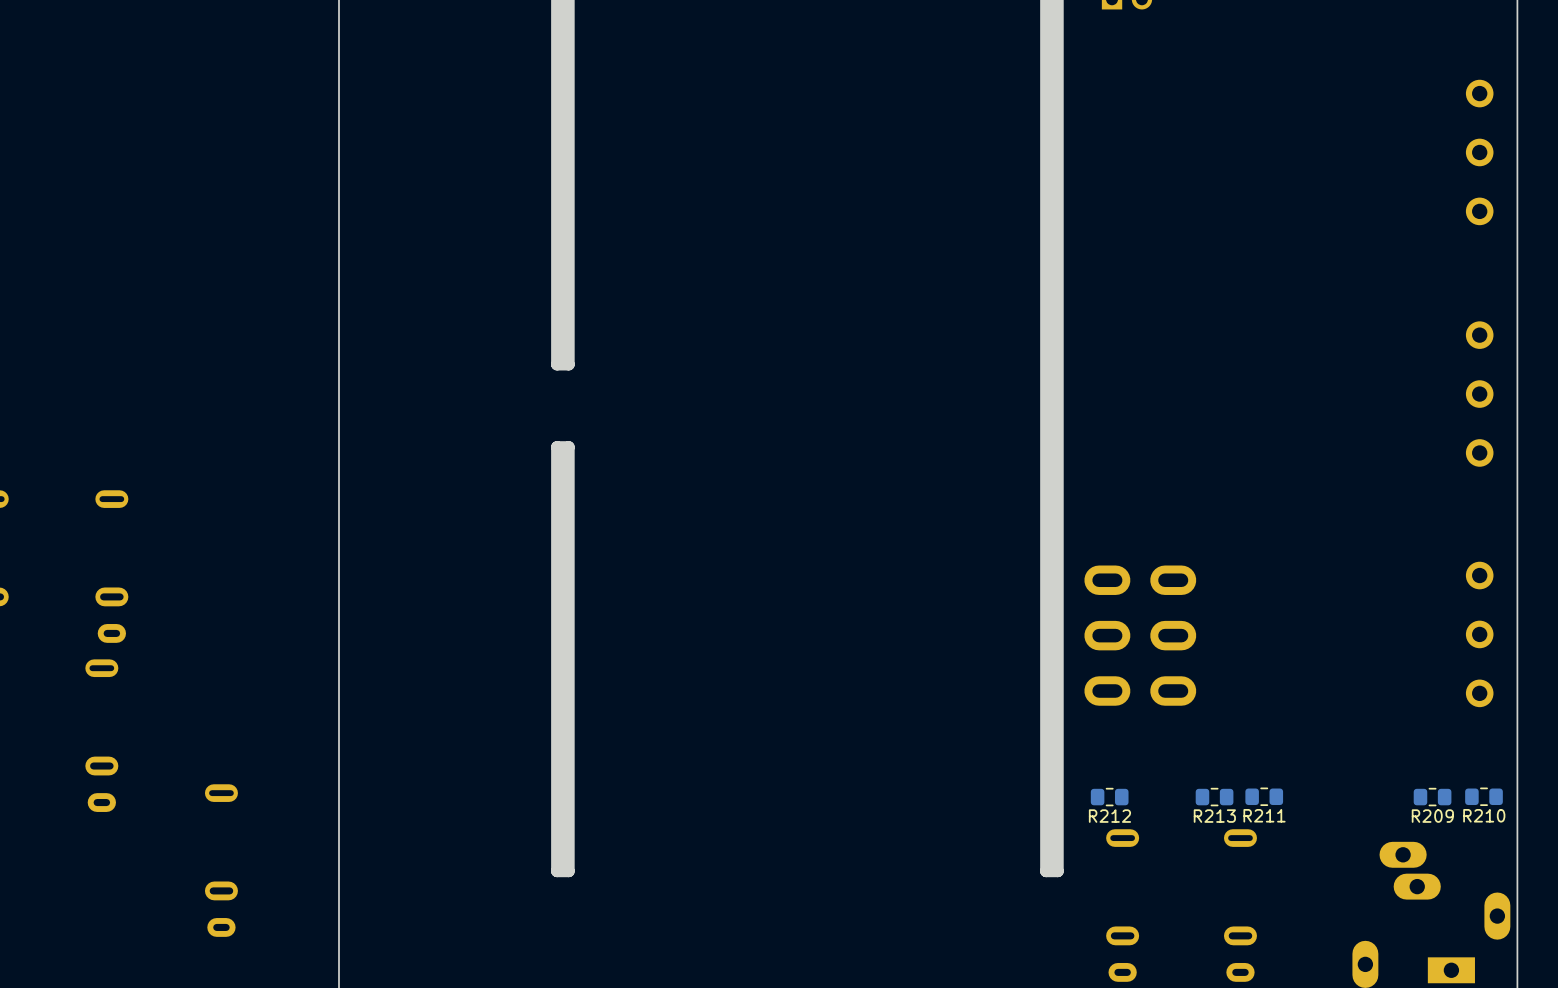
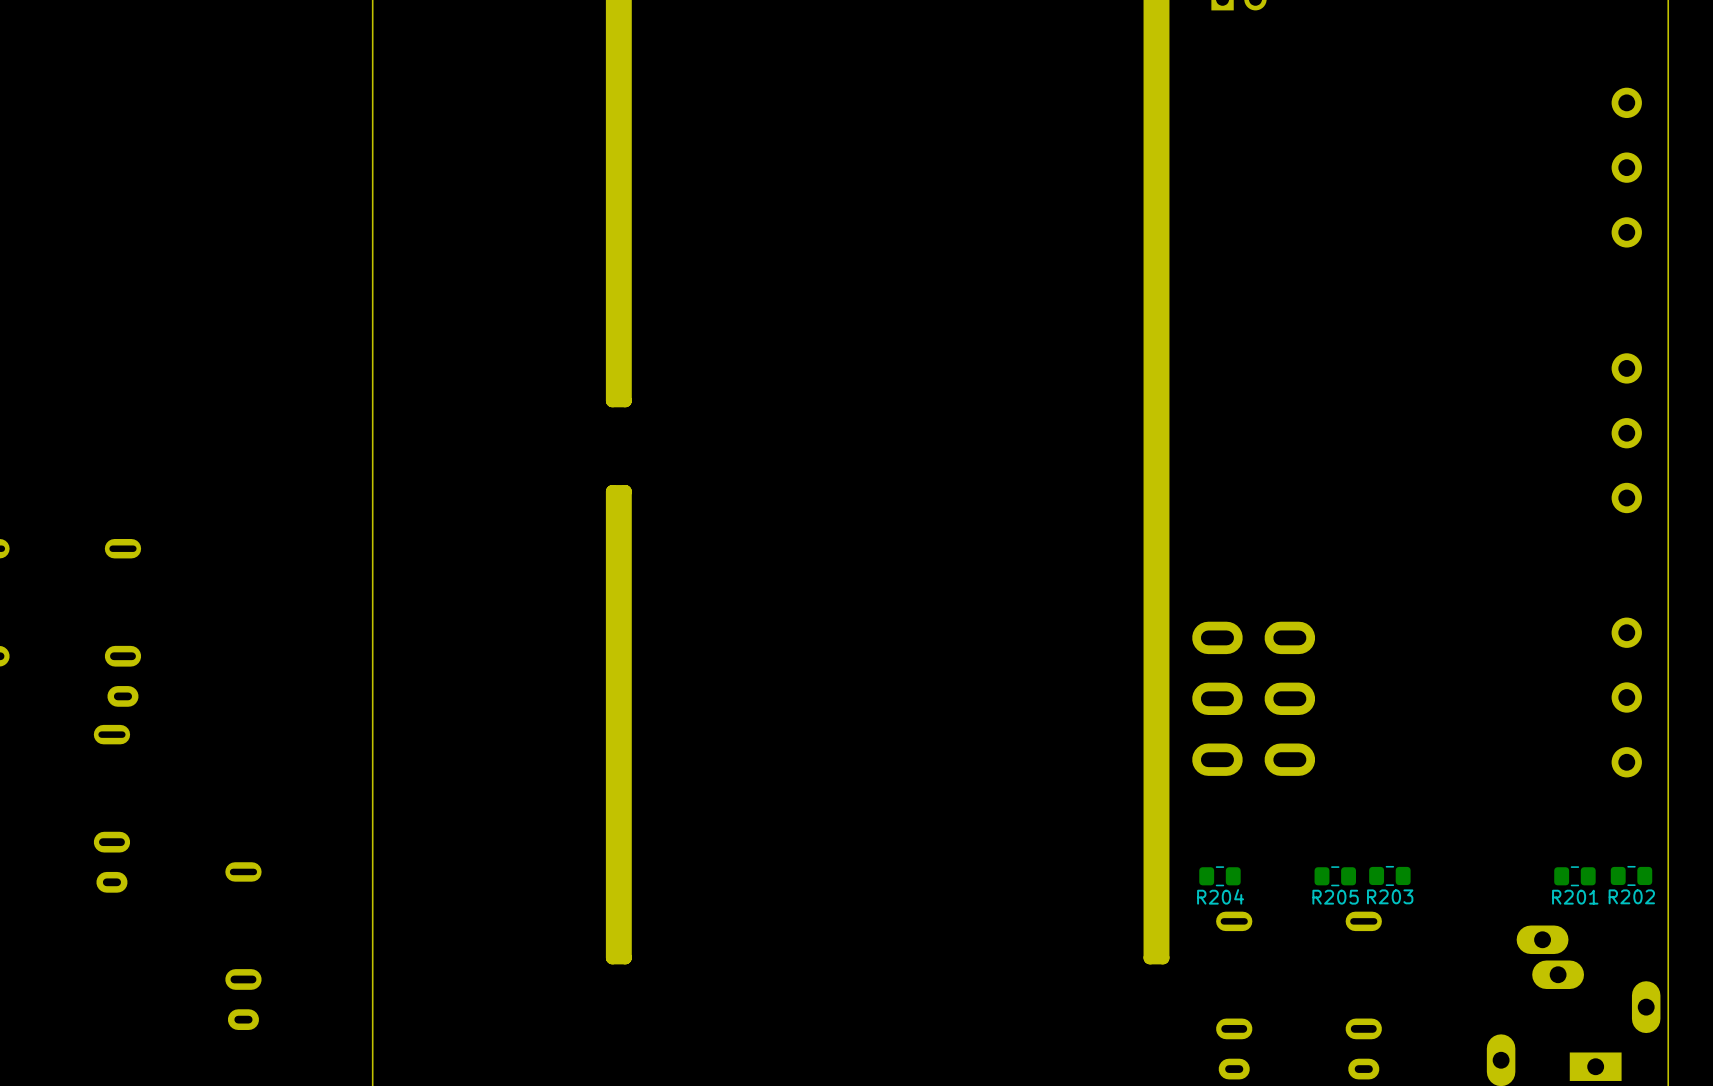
R211 name: R211 (1264, 815) -> R203 (1390, 896)
R210 name: R210 (1484, 815) -> R202 (1631, 896)
R212 name: R212 (1109, 816) -> R204 (1220, 896)
R213 name: R213 (1214, 816) -> R205 (1335, 897)
R209 name: R209 (1432, 816) -> R201 (1575, 897)

